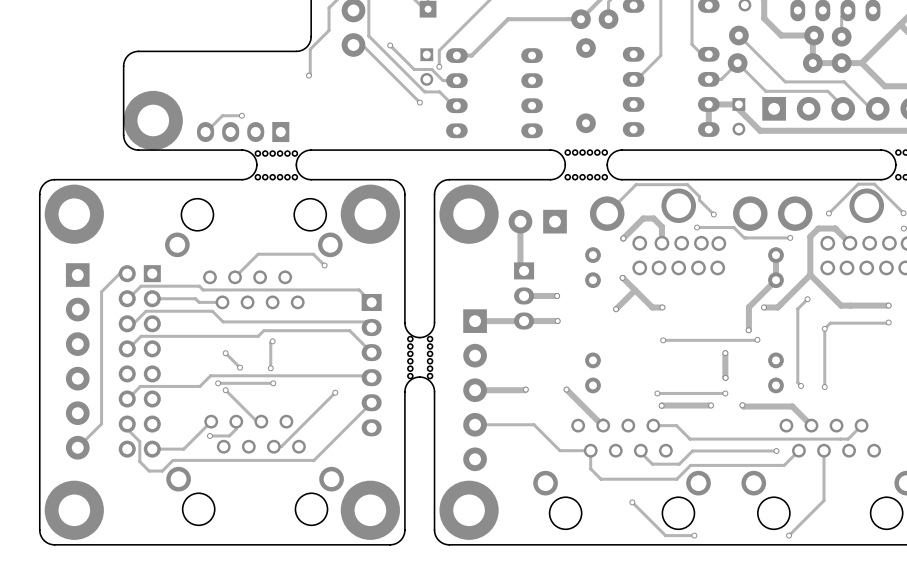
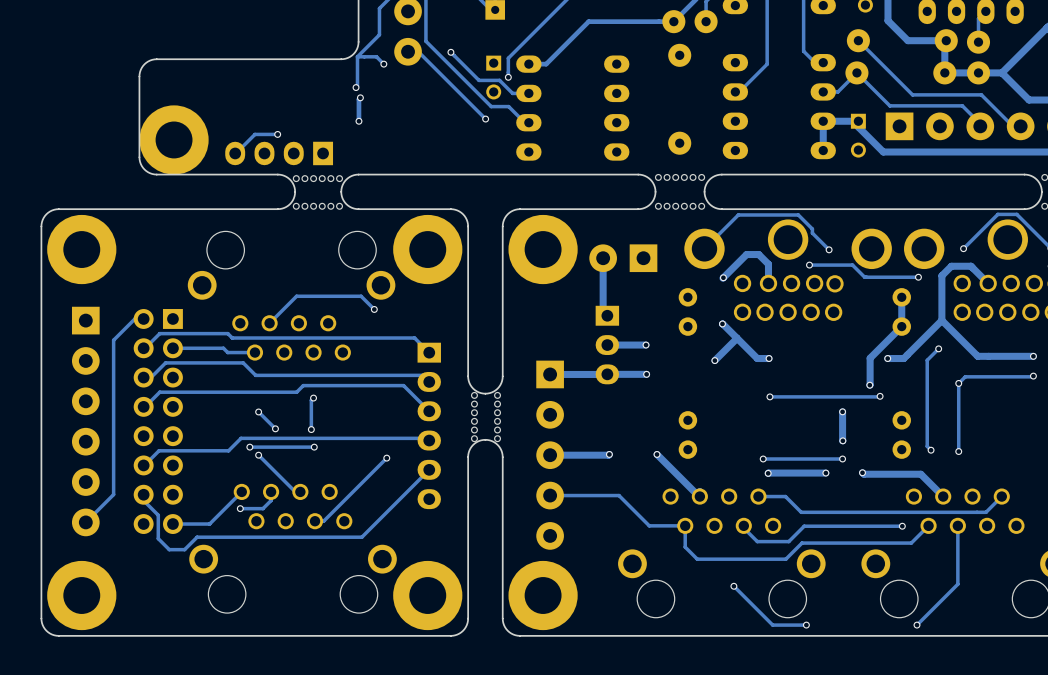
track: none -> (357, 56) (376, 56) (383, 64)
via: none -> (383, 64)
track: none -> (360, 97) (358, 121)
via: none -> (360, 97)
via: none -> (358, 121)

